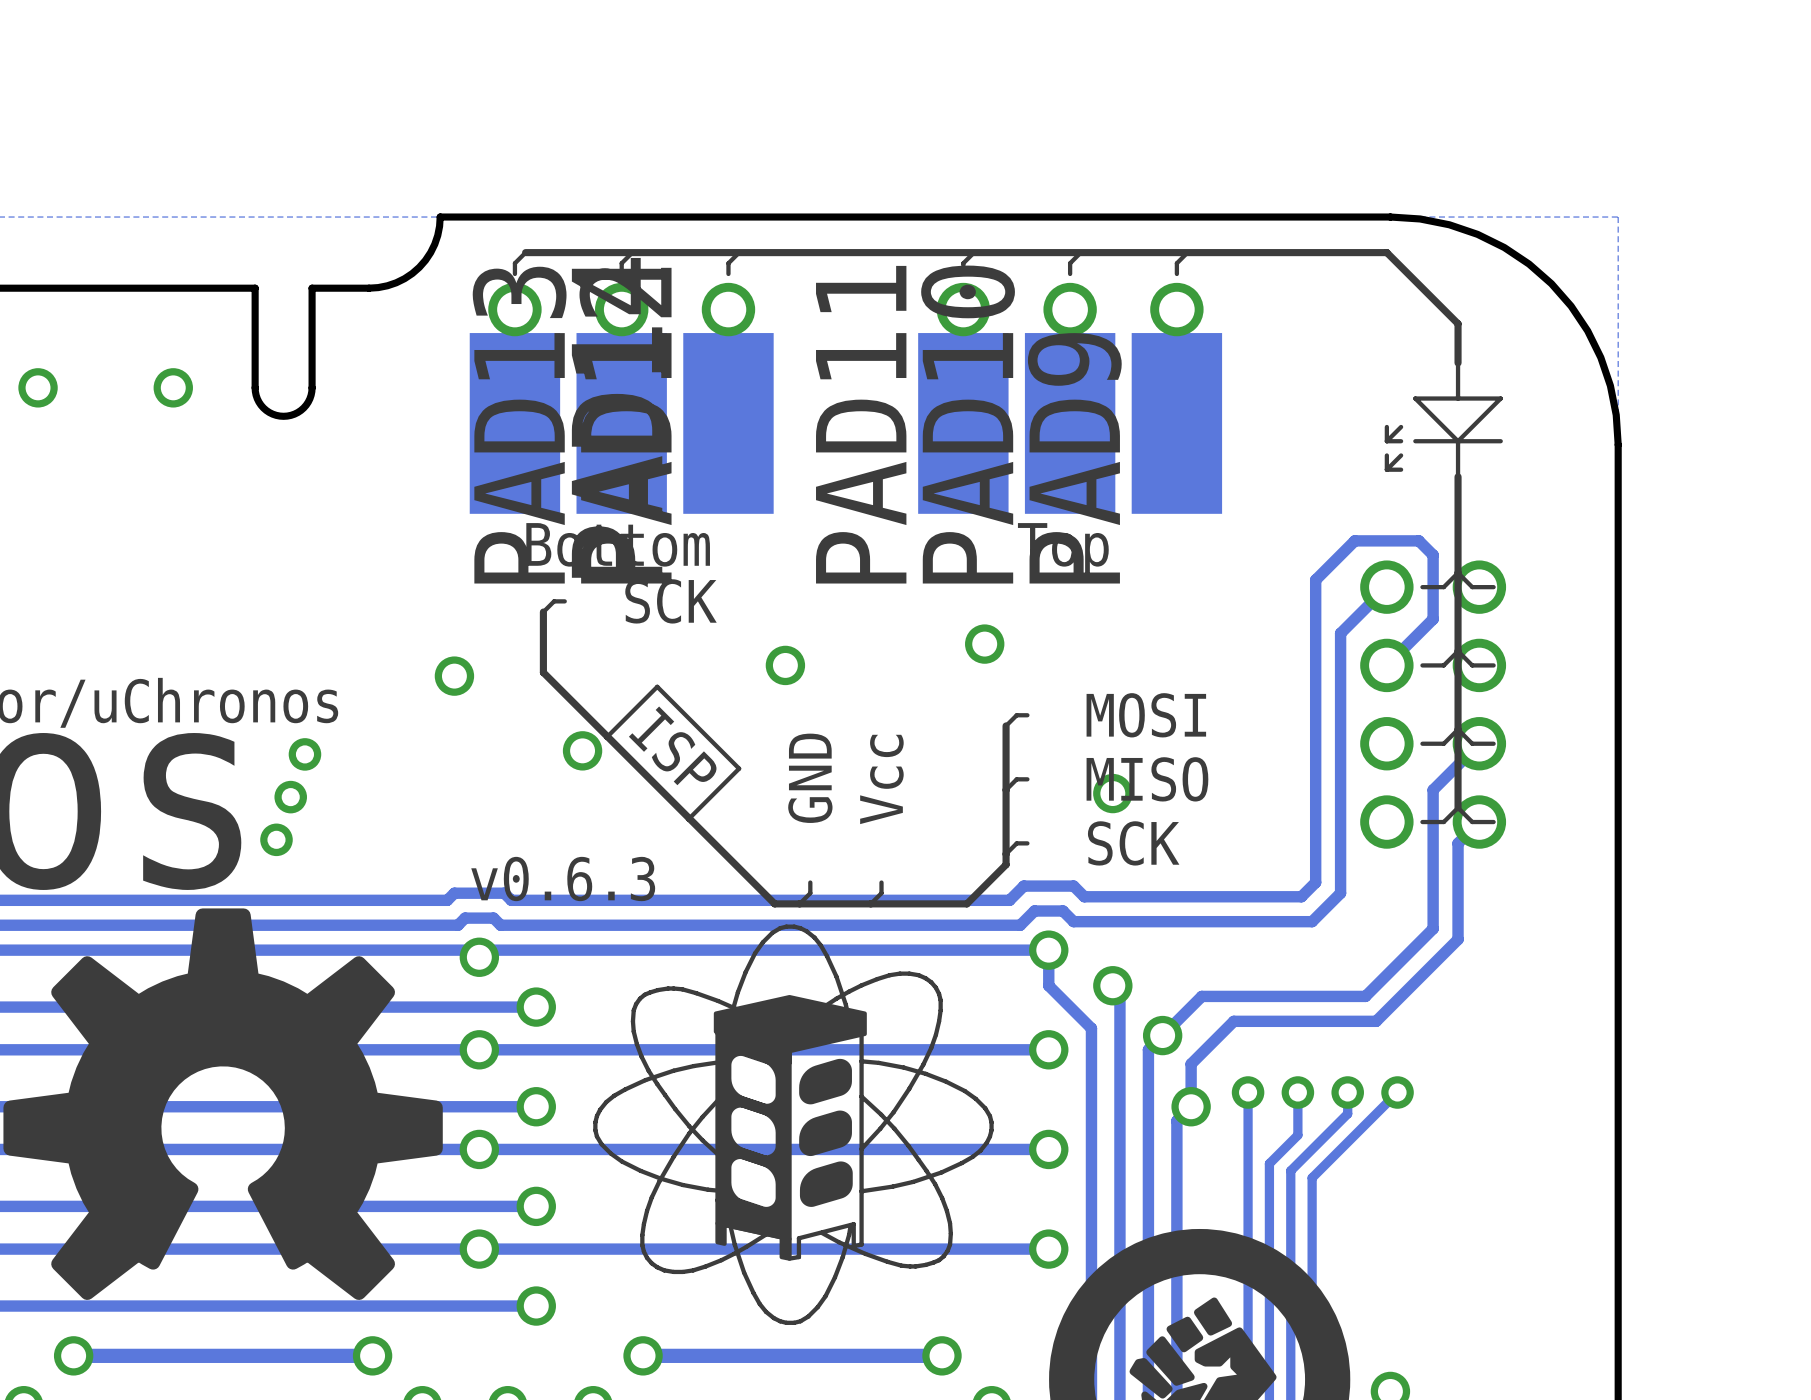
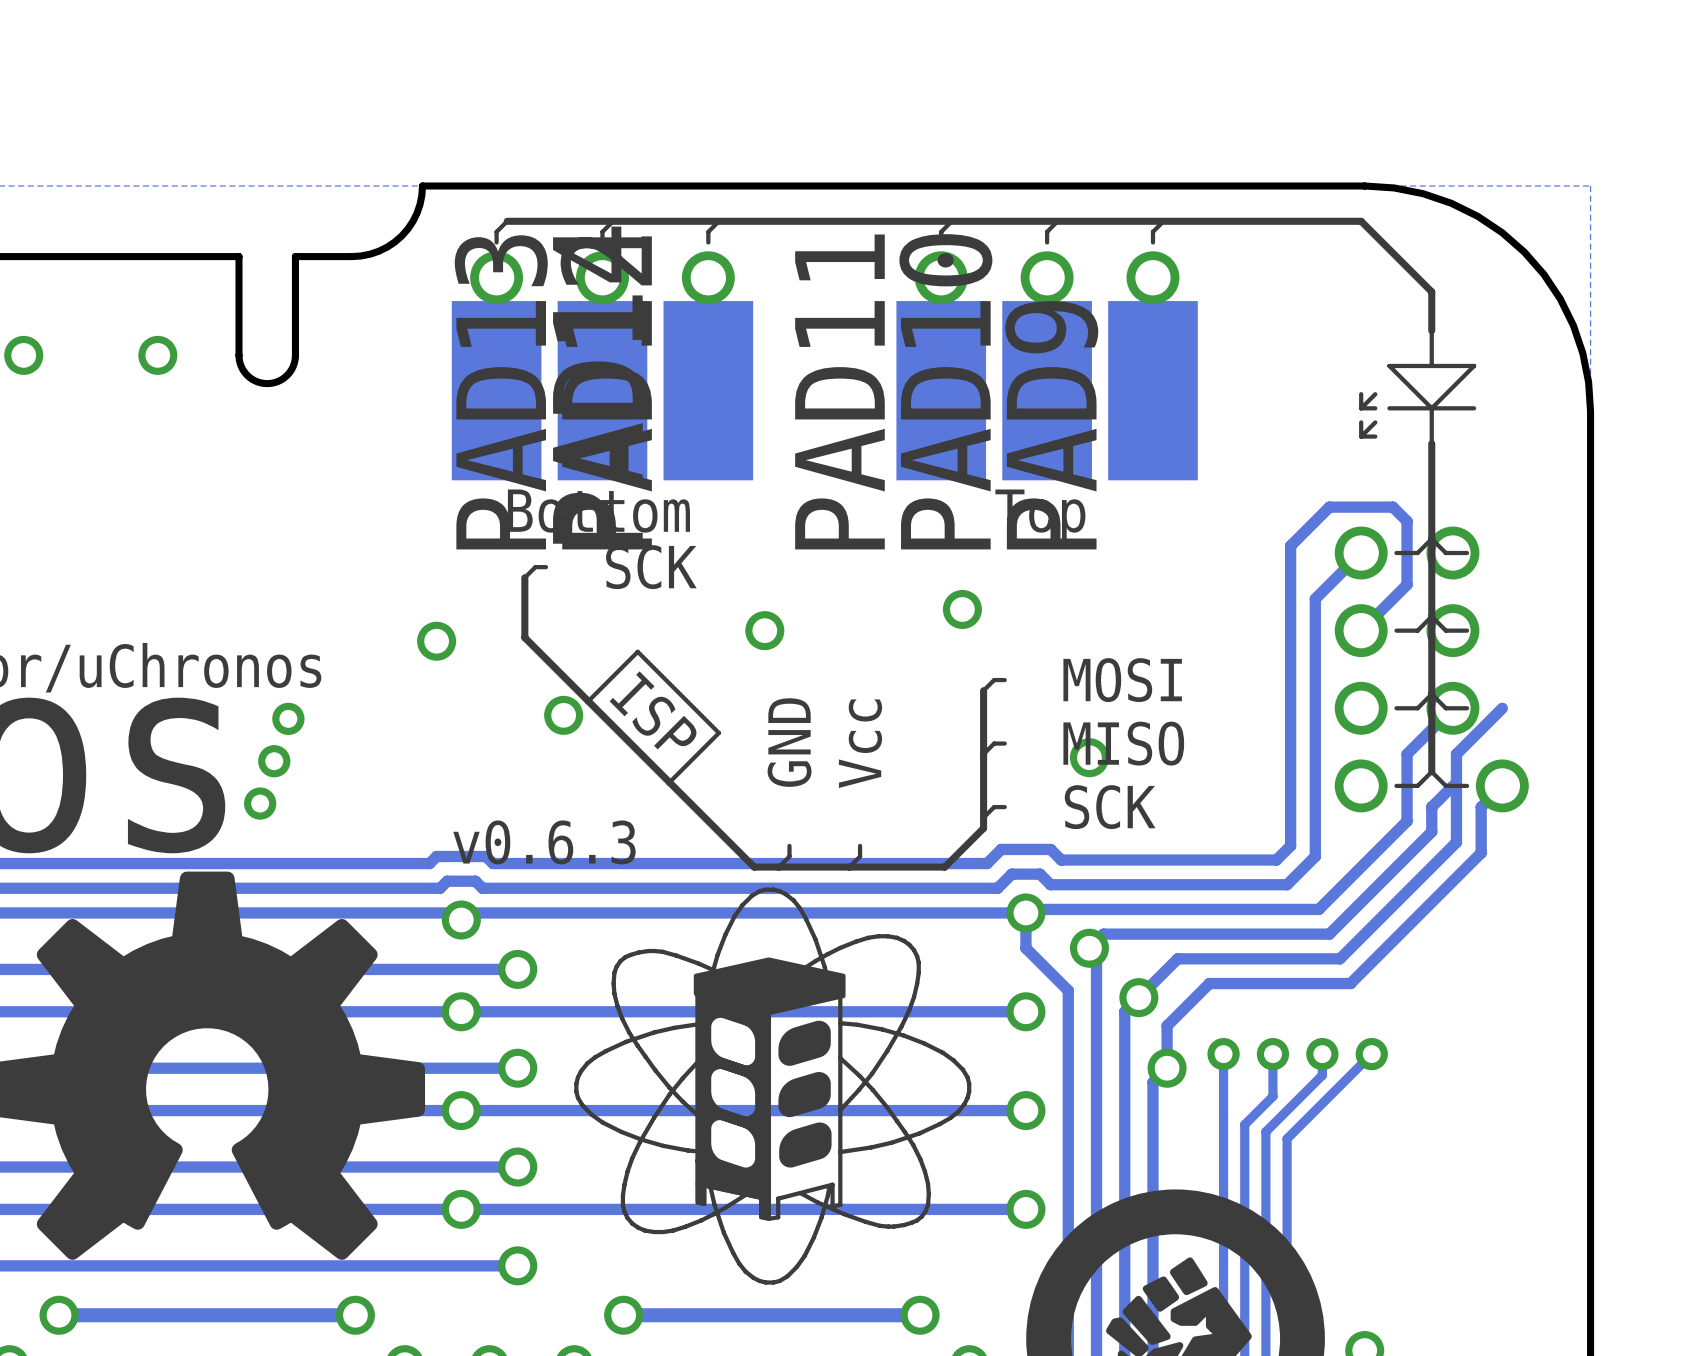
via position: (1479, 822) -> (1502, 785)
track: (1433, 857) (1433, 928) -> (1502, 708) (1456, 754) (1456, 842) (1407, 891)
track: none -> (1407, 821) (1318, 909) (1029, 909) (1025, 912)
track: (1458, 868) (1458, 939) -> (1502, 785) (1481, 807) (1481, 852) (1431, 902)
track: none -> (1431, 831) (1329, 934) (1103, 934) (1089, 948)

